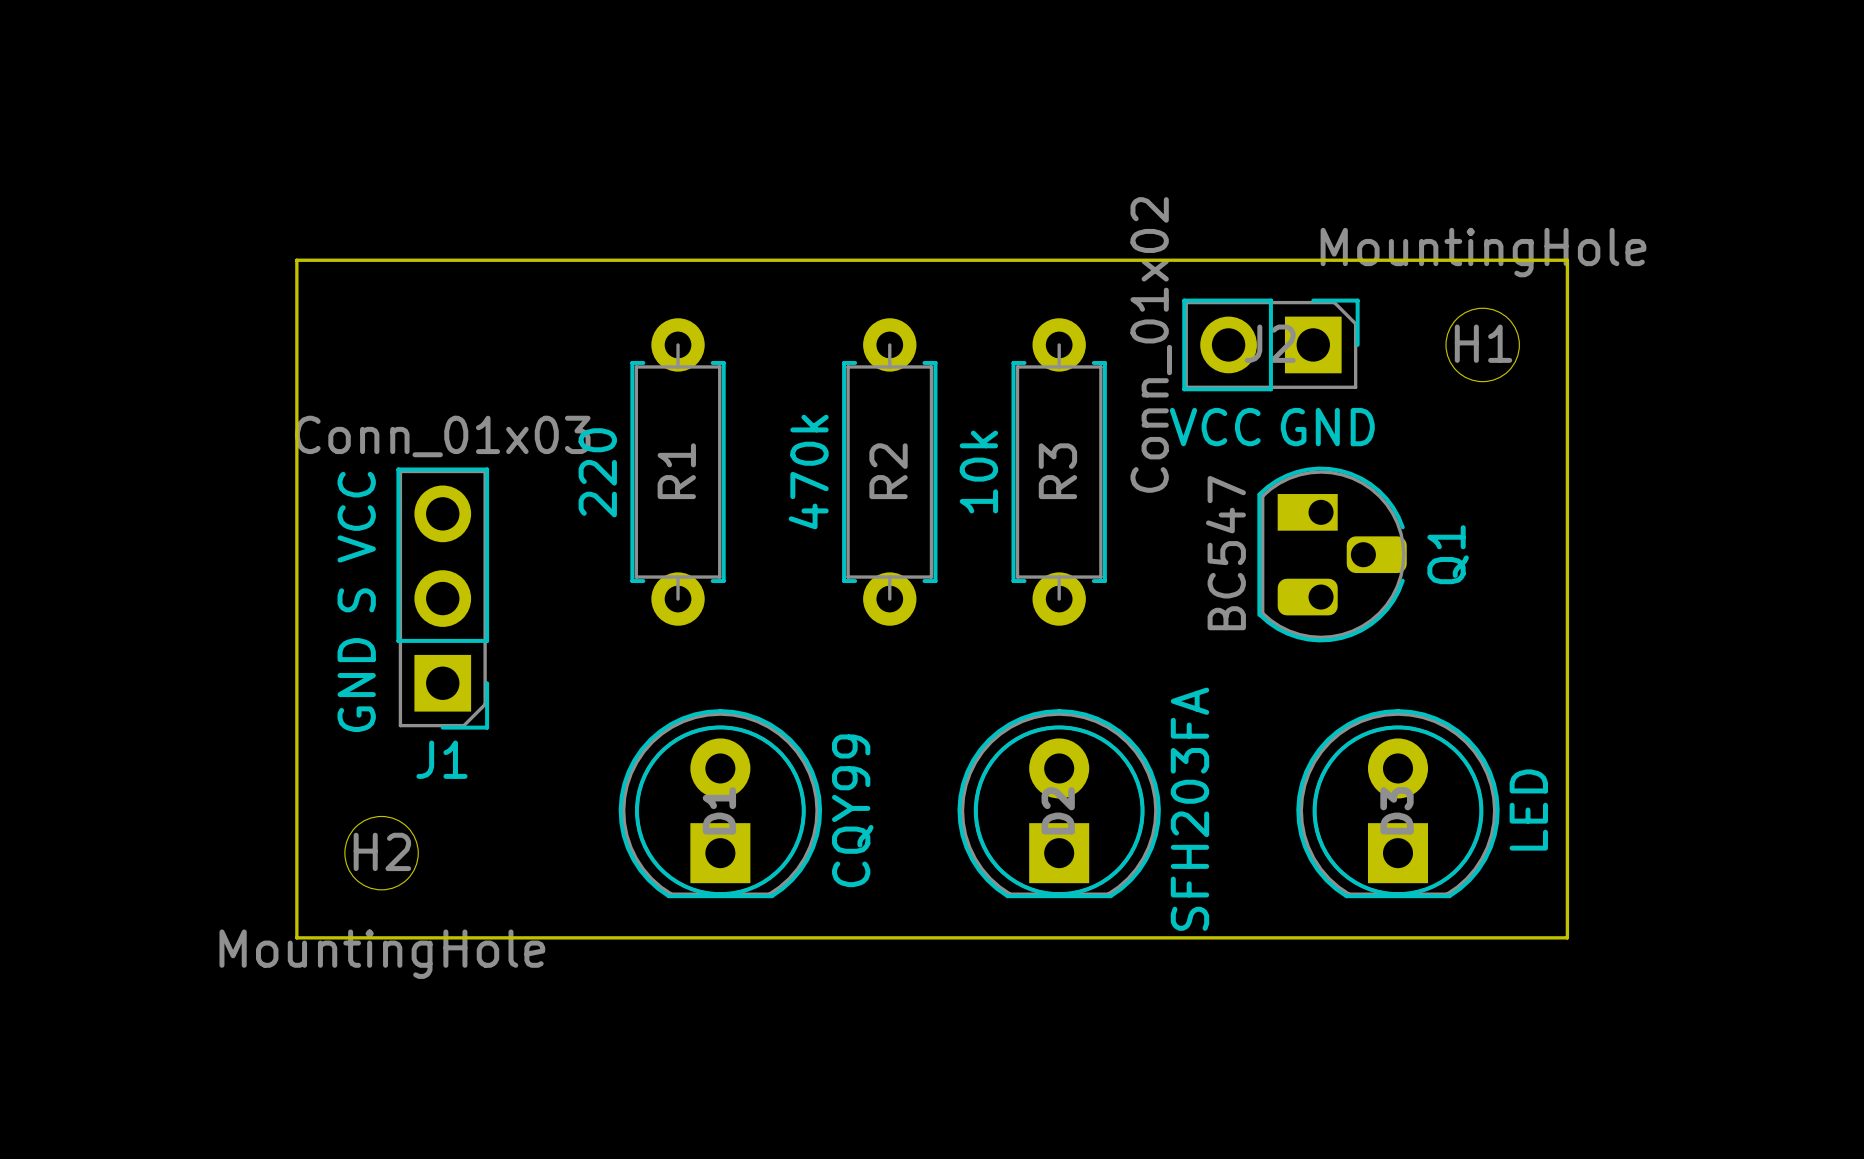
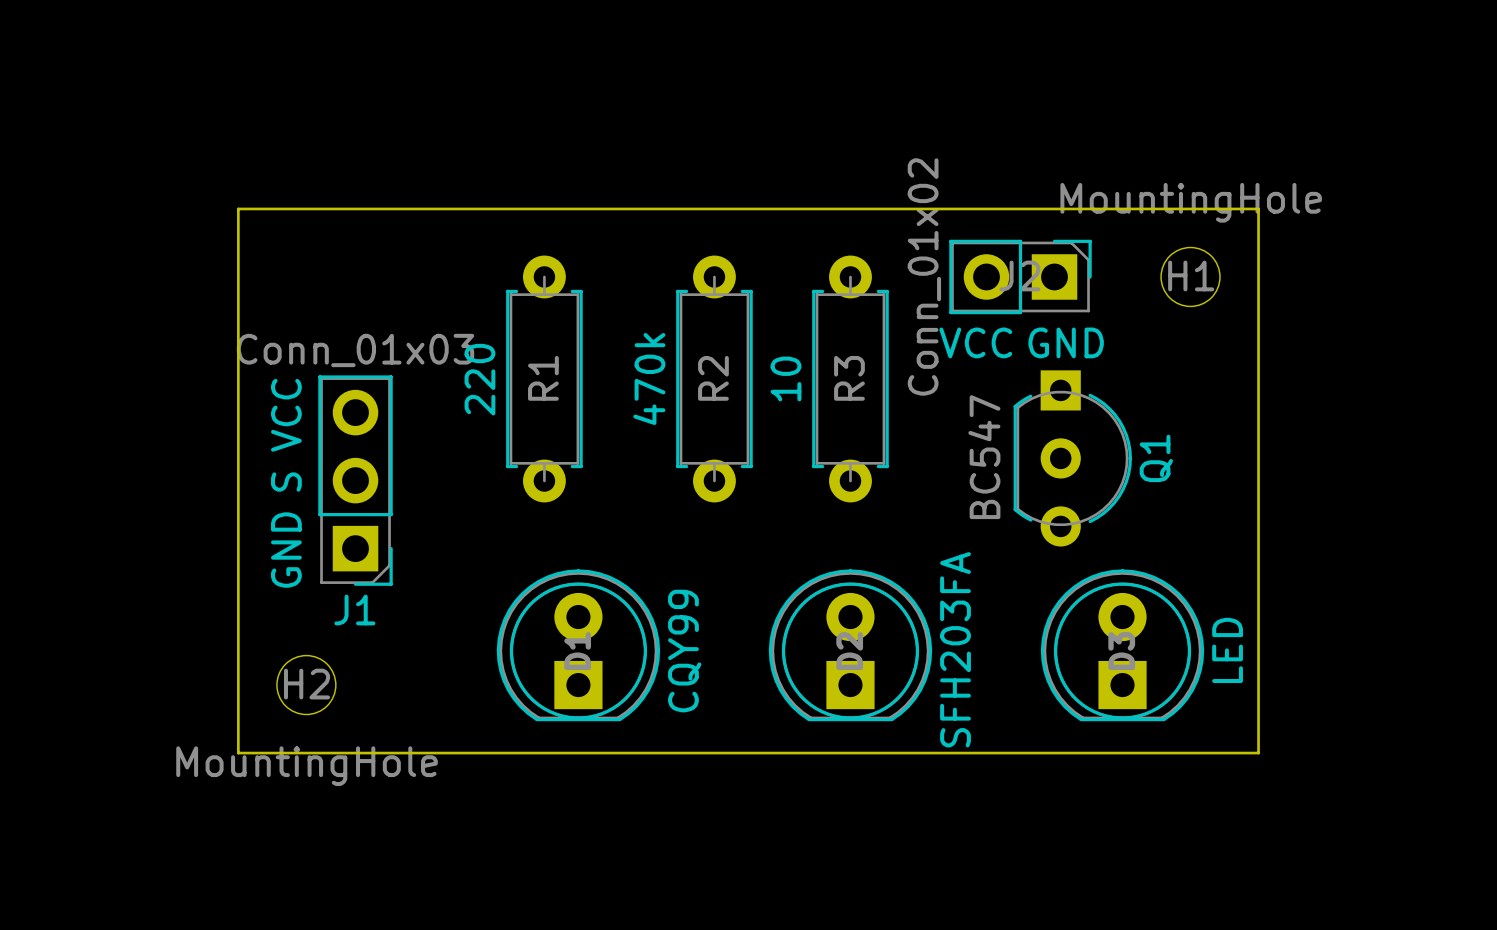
Q1 footprint: [1257, 466, 1407, 643] -> [1013, 370, 1132, 547]
R3 value: 10k (978, 472) -> 10 (786, 378)

